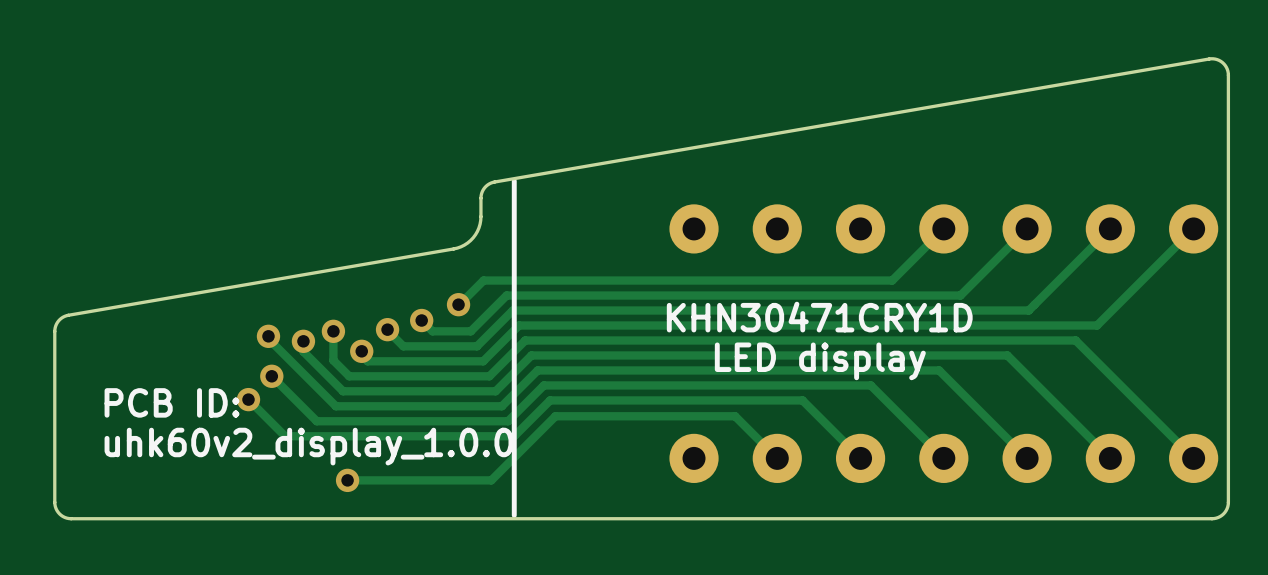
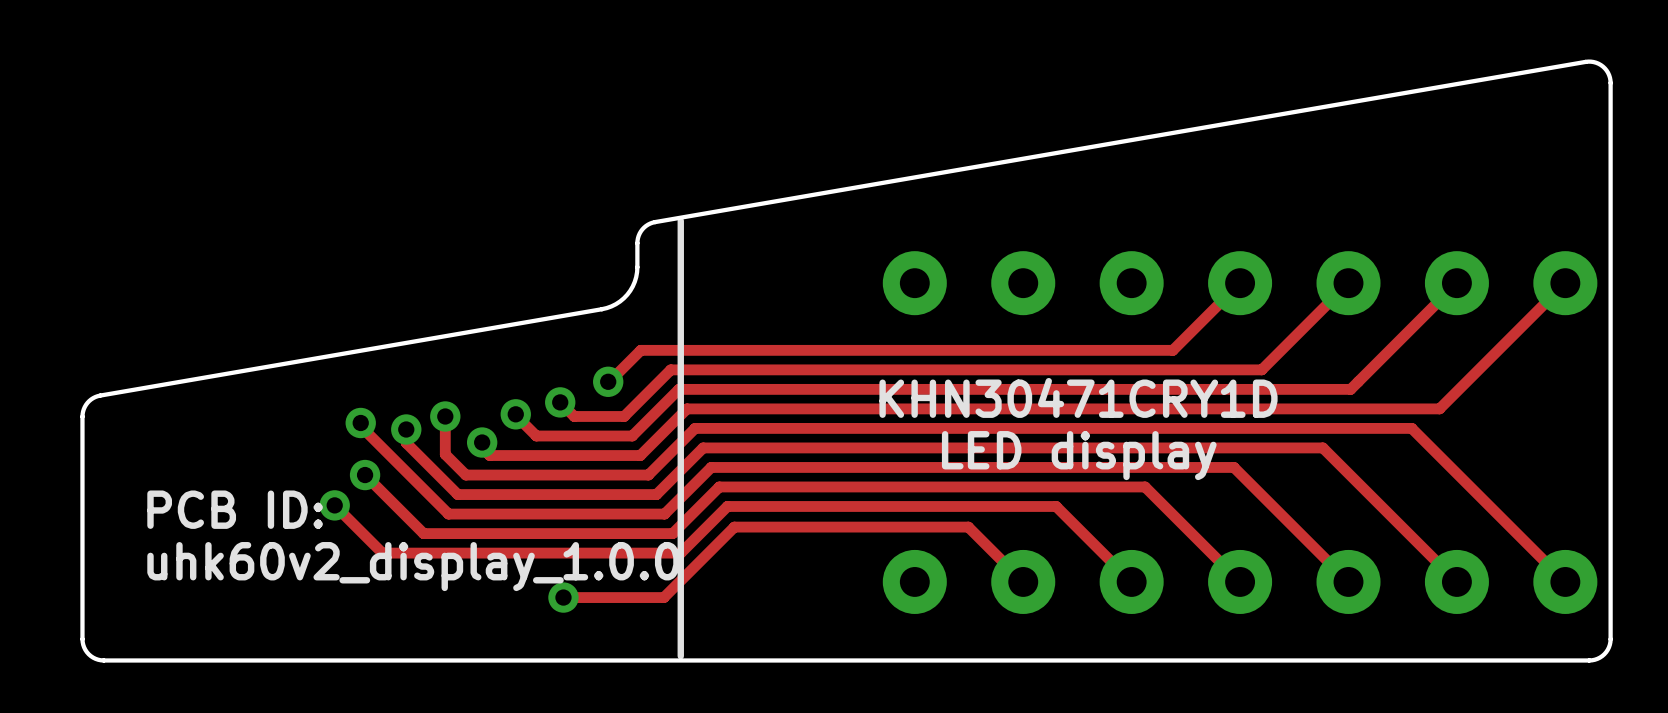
track: (501, 470) (491, 480) (347, 480) -> (663, 597) (563, 597)
via position: (347, 480) -> (563, 597)

